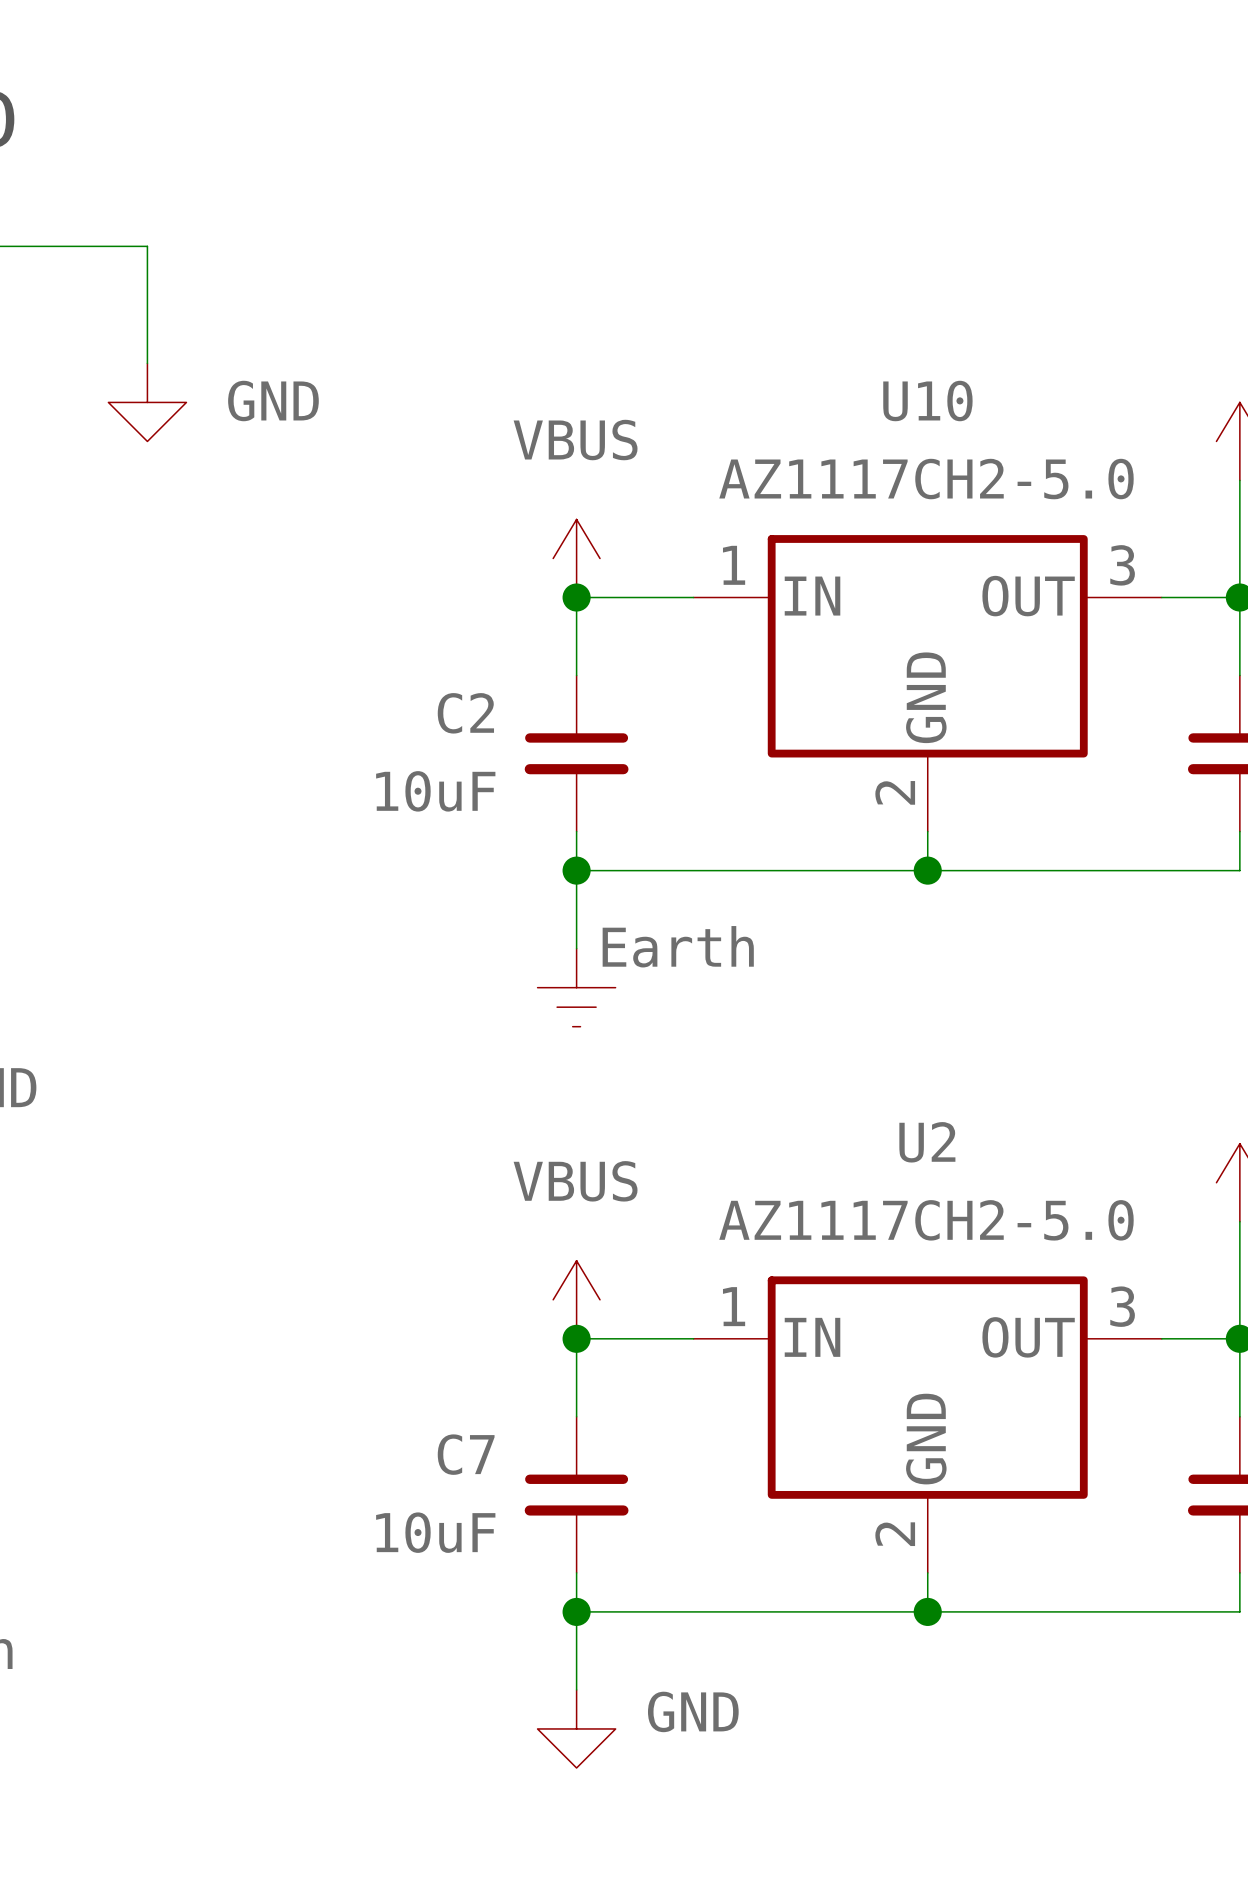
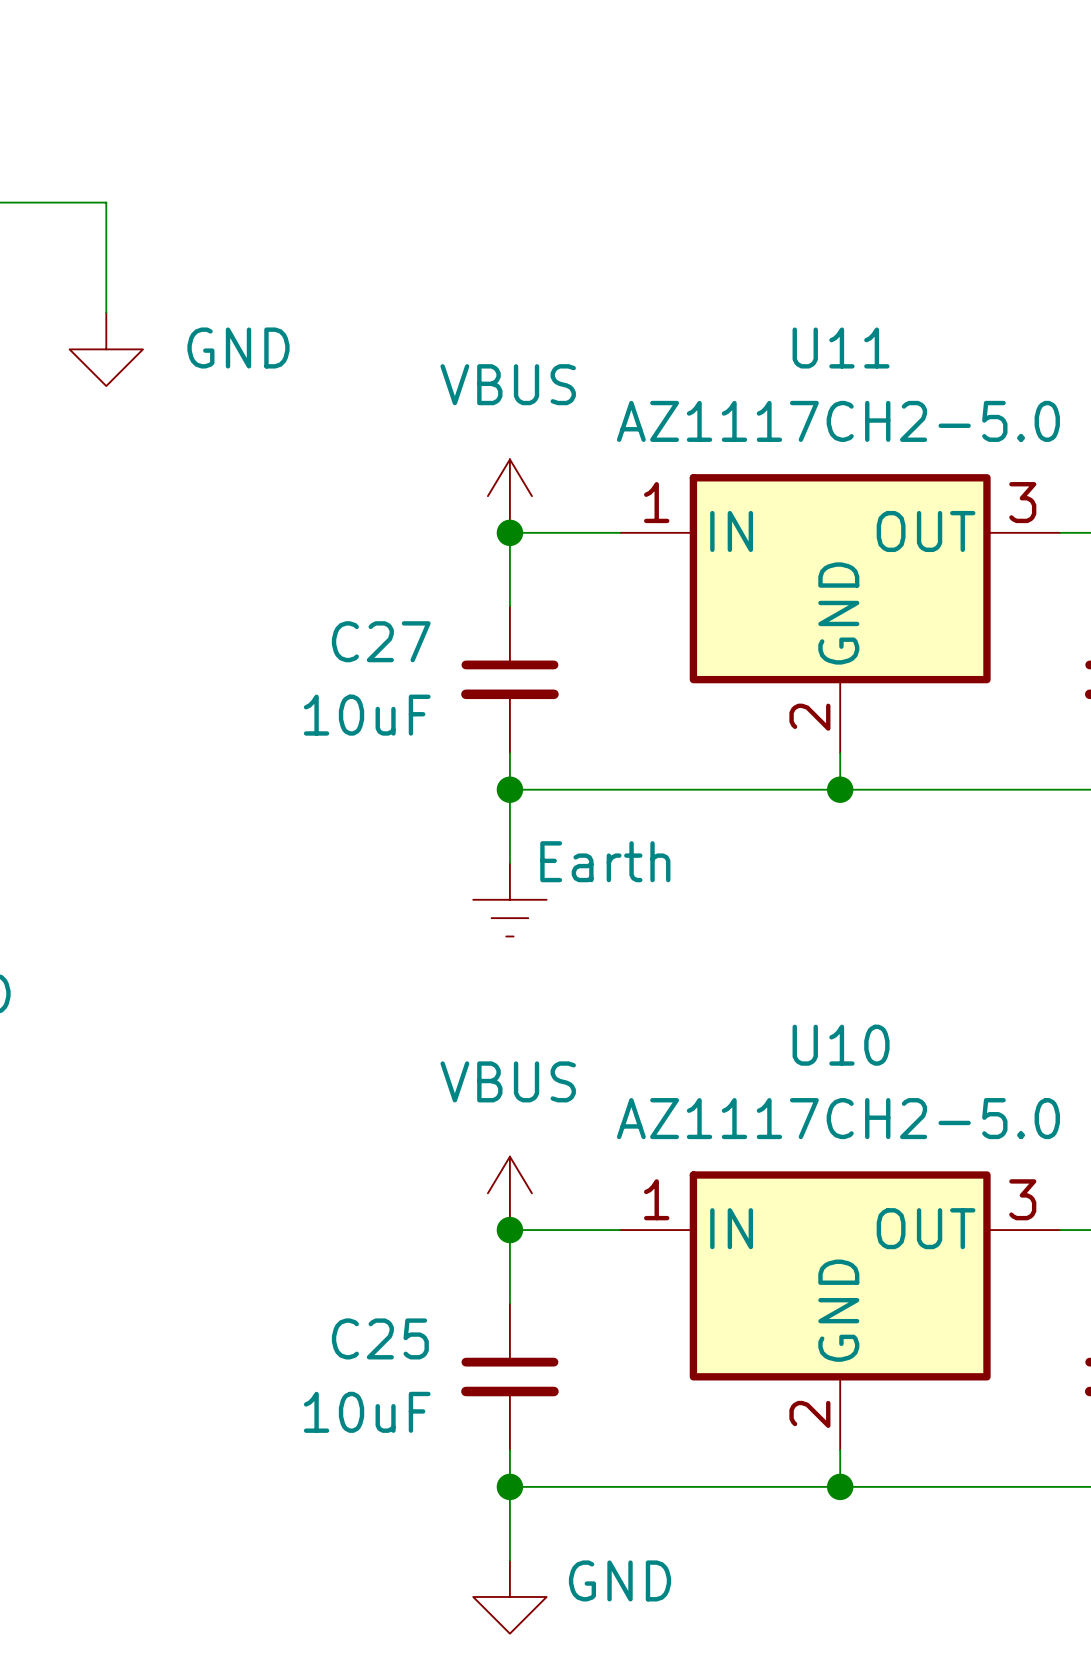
U10 name: U10 (927, 401) -> U11 (841, 348)
C2 name: C2 (465, 713) -> C27 (381, 641)
U2 name: U2 (927, 1142) -> U10 (841, 1045)
C7 name: C7 (466, 1454) -> C25 (380, 1338)

